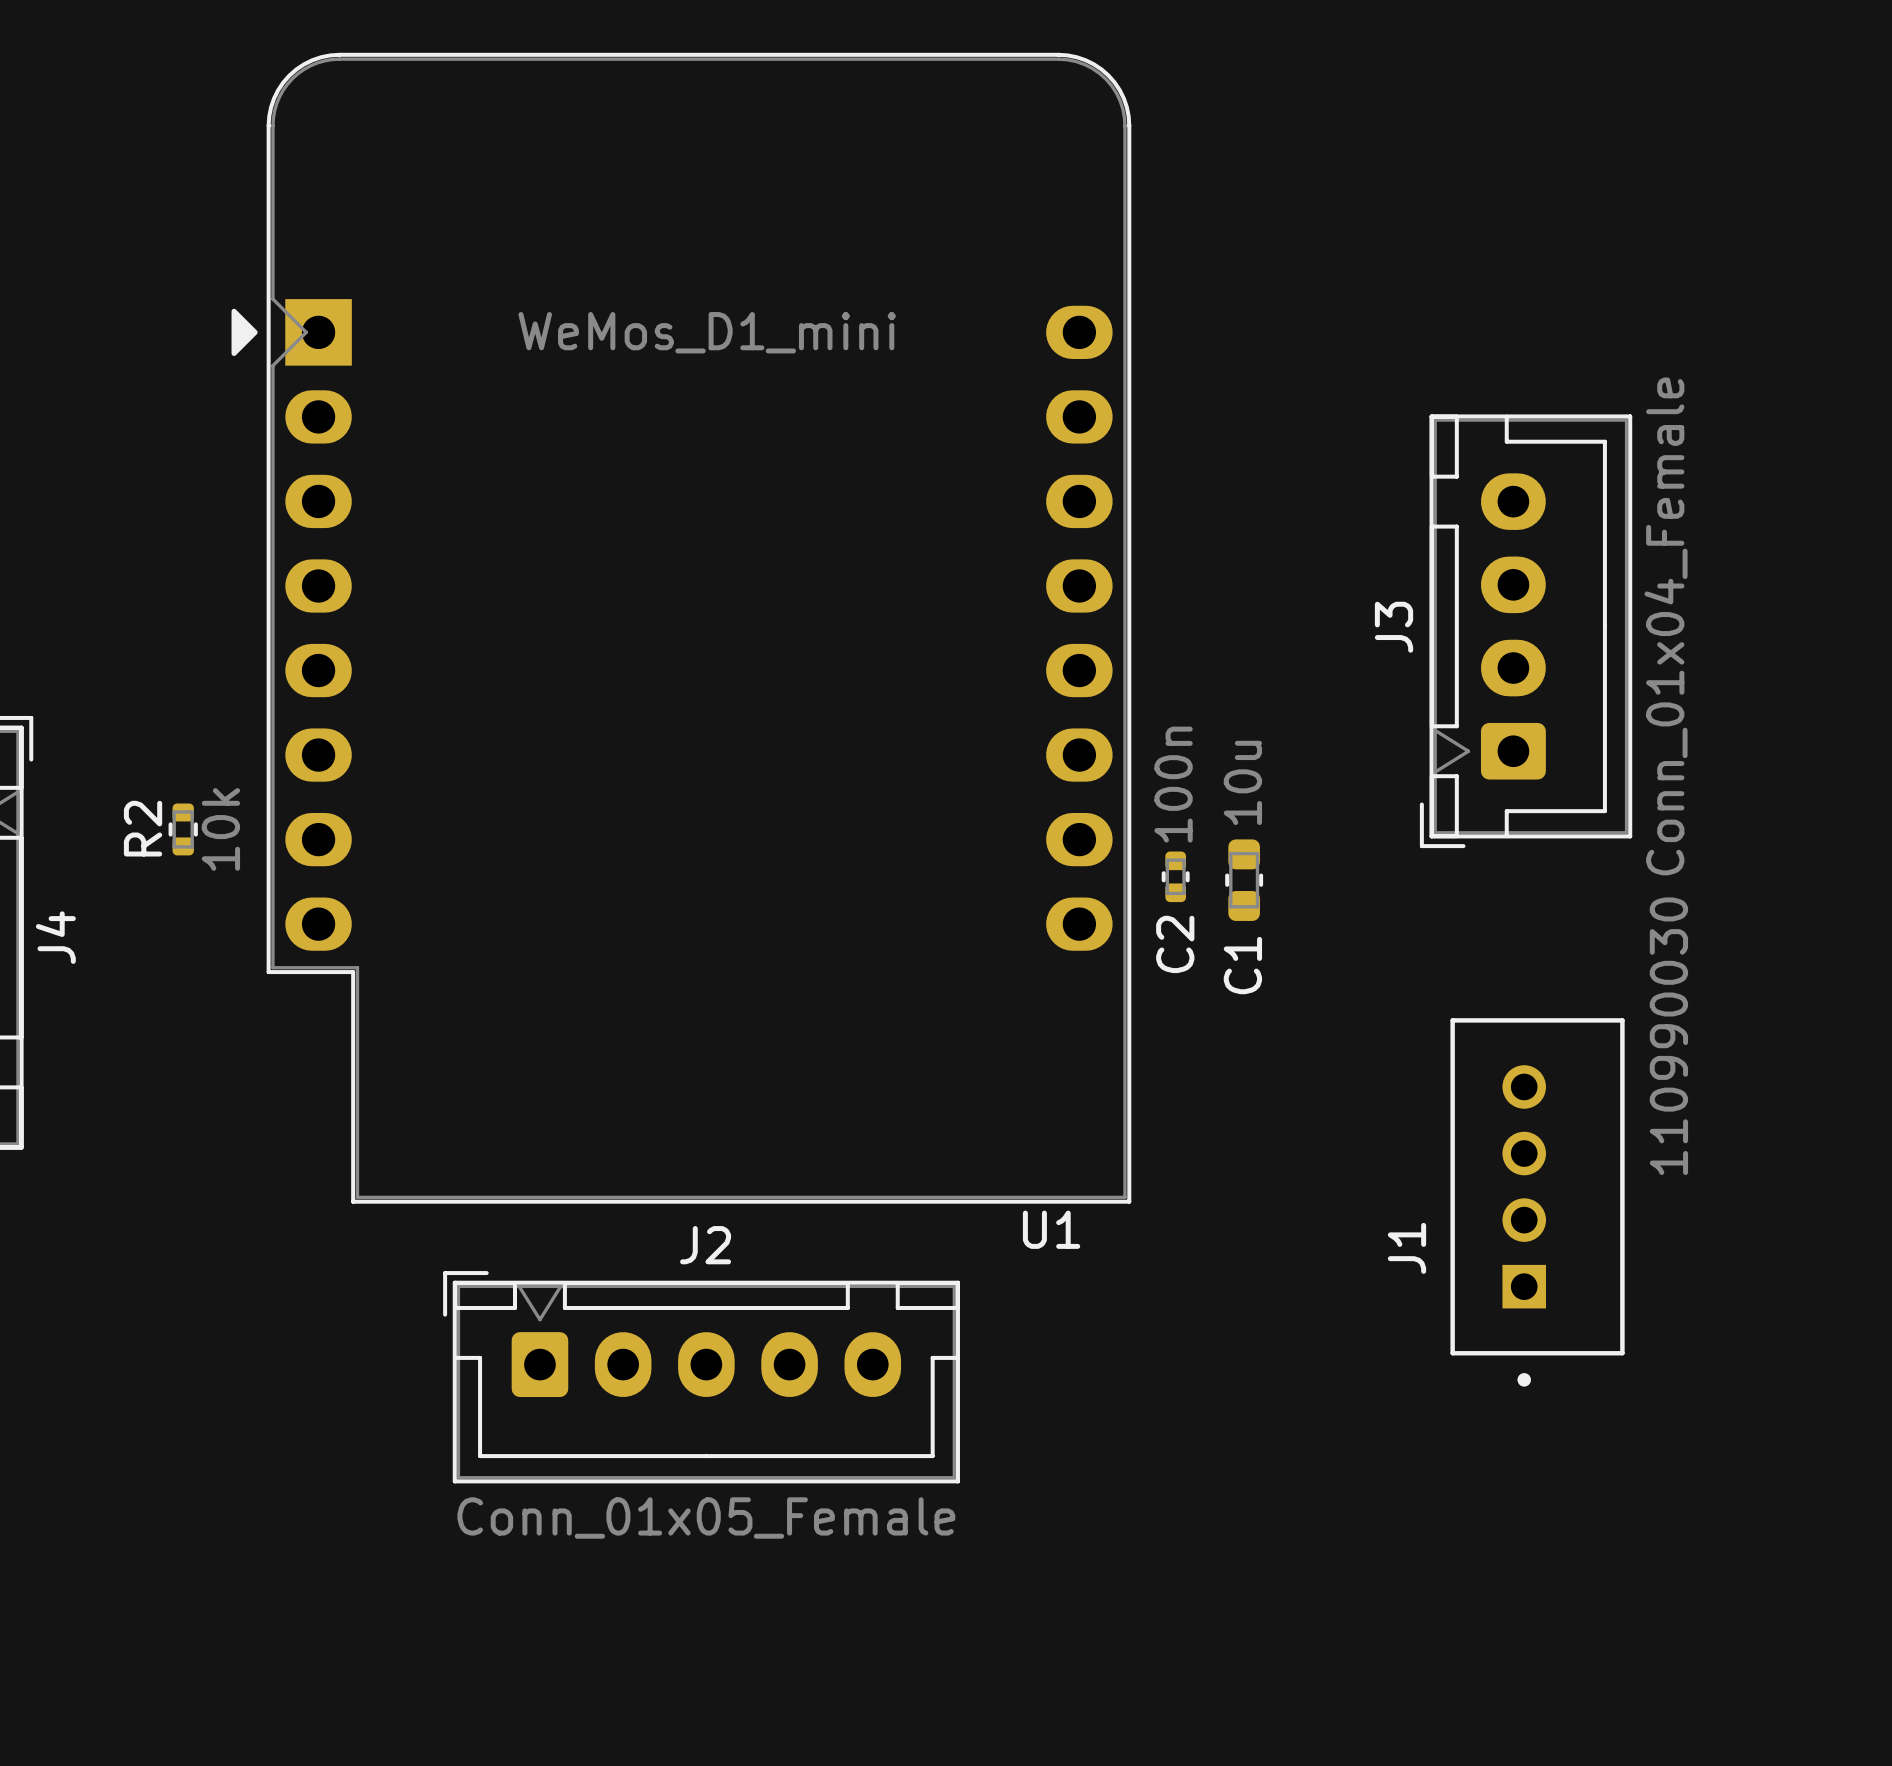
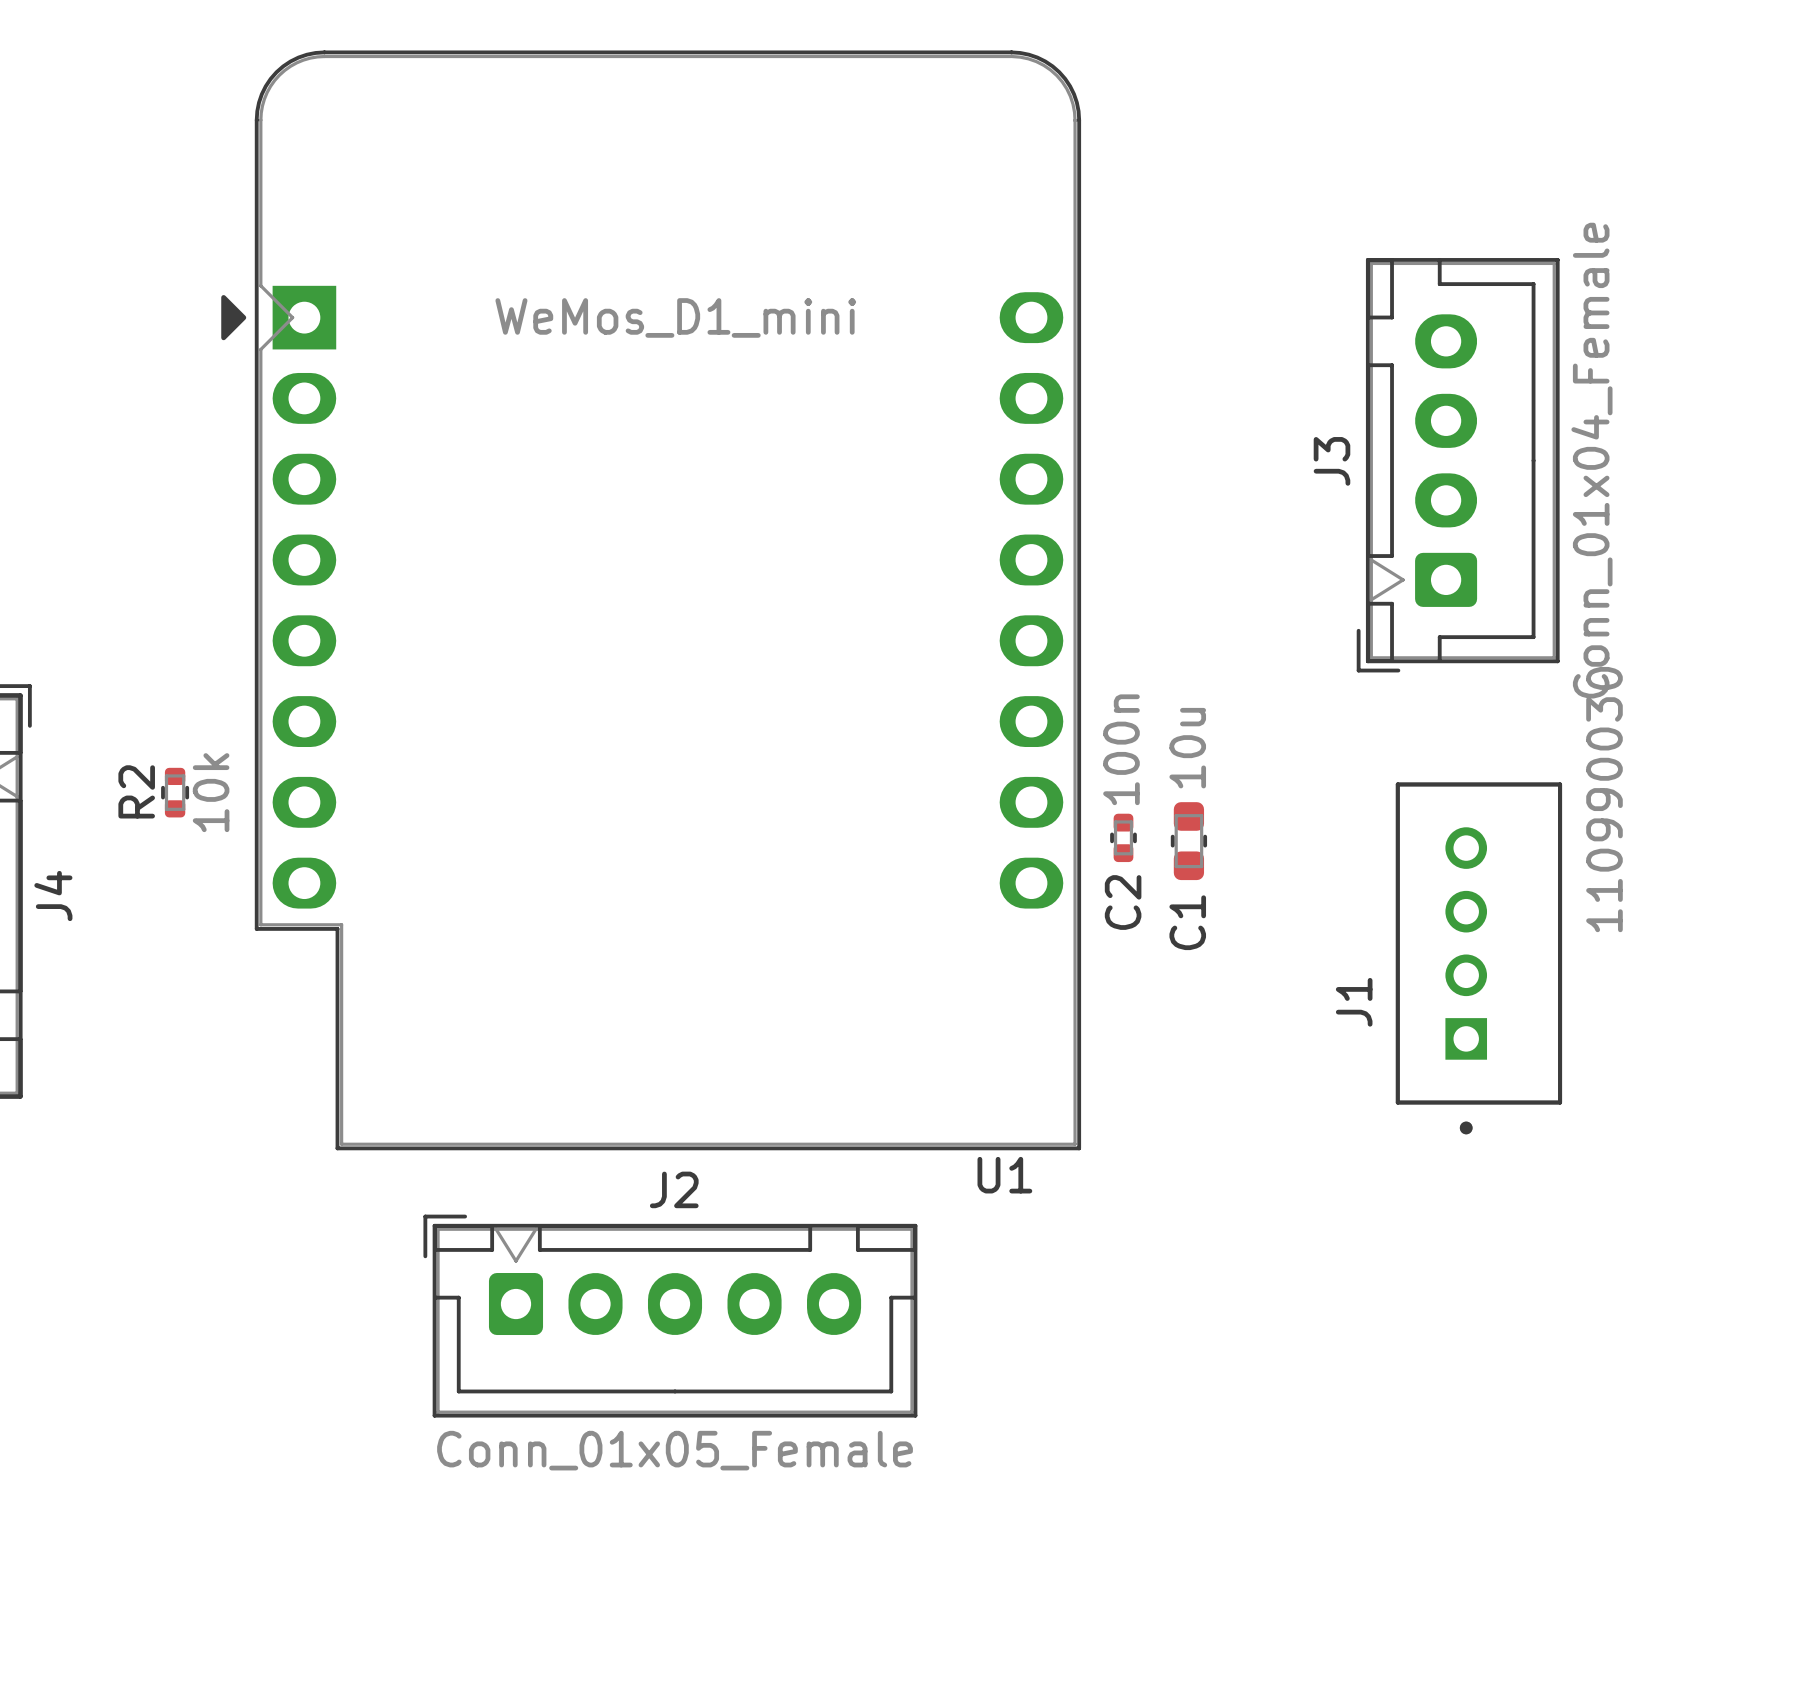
J3 position: (1526, 631) -> (1458, 465)
J1 position: (1537, 1202) -> (1478, 958)

